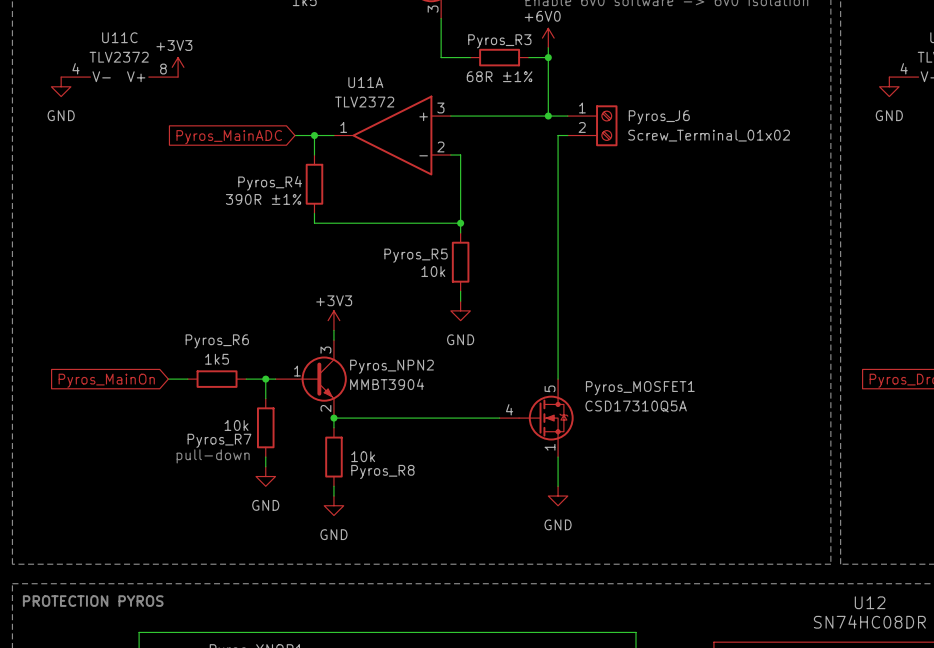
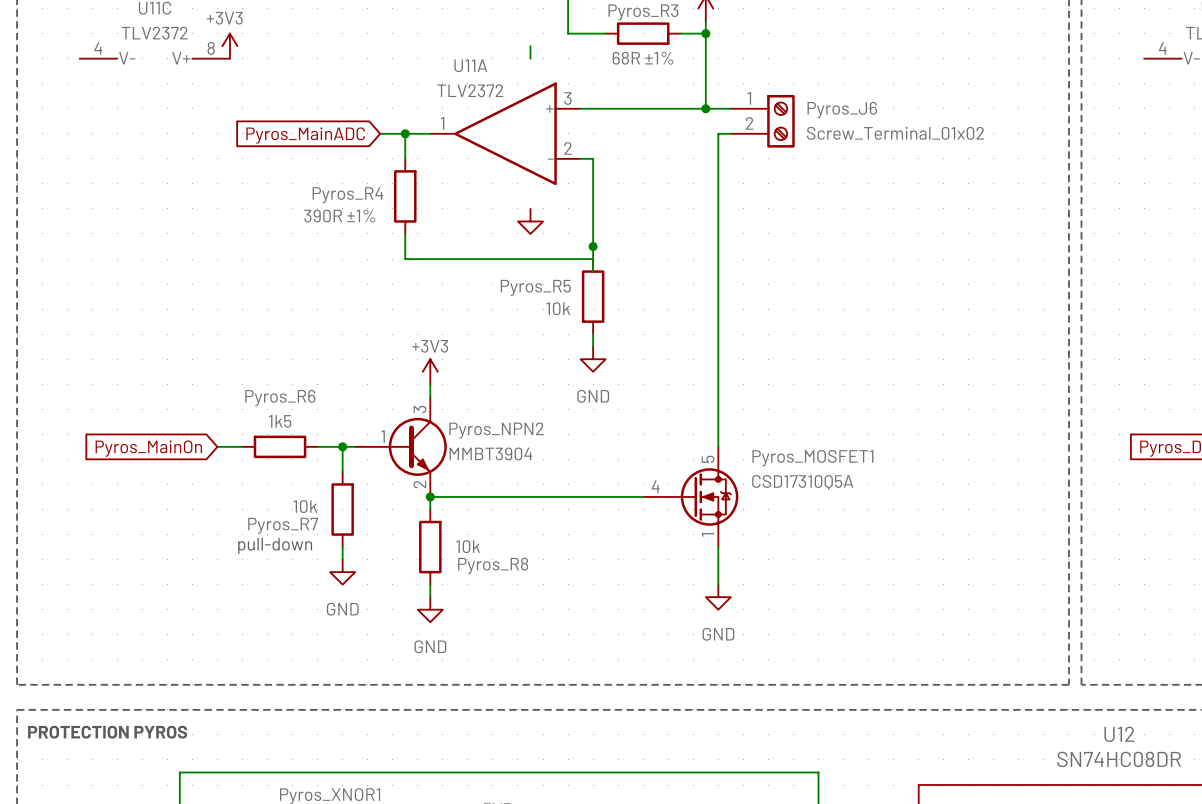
wire: none -> (530, 46) (530, 58)
power symbol: GND (61, 86) -> none
power symbol: GND (889, 86) -> none
power symbol: none -> (530, 221)
wire: (314, 223) (460, 223) -> (405, 246) (405, 259) (593, 259) (593, 271)

